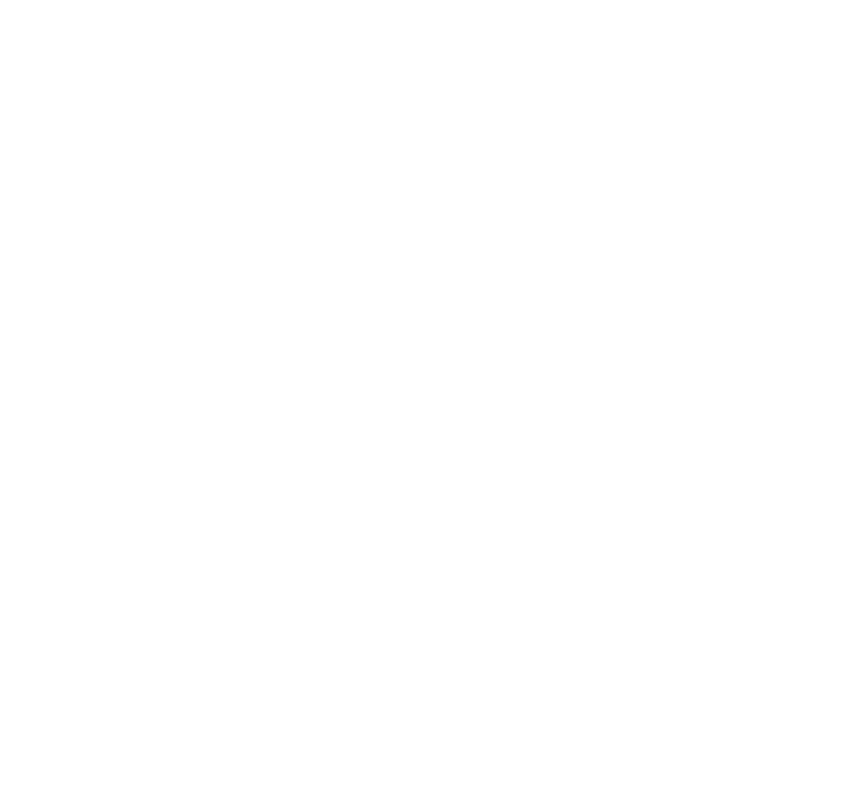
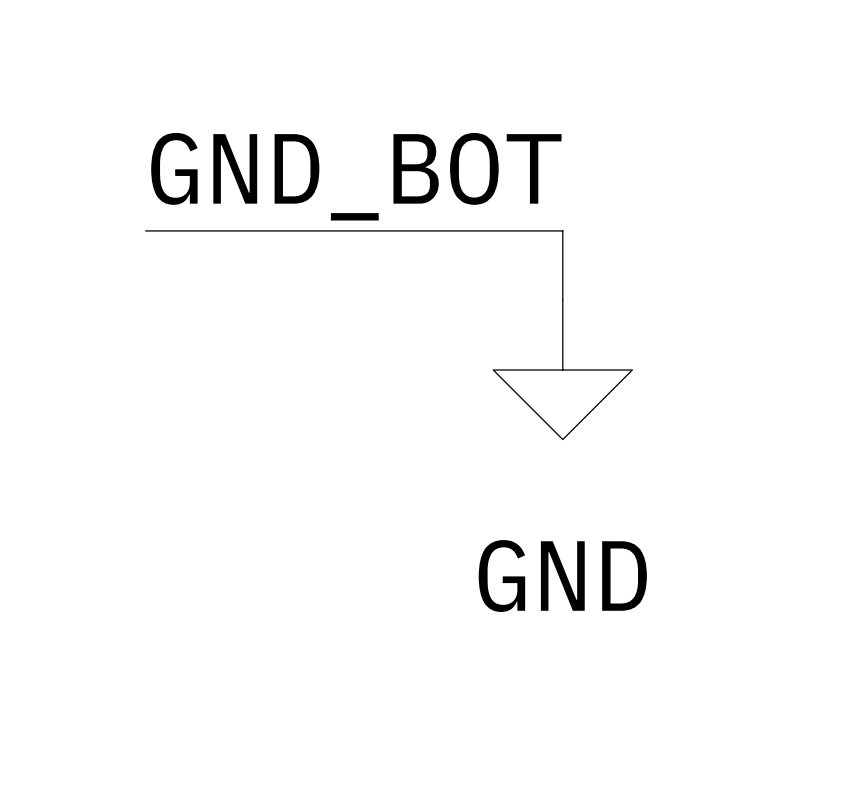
label: none -> GND_BOT (356, 176)
wire: none -> (145, 230) (562, 230) (562, 300)
power symbol: none -> GND (562, 370)

